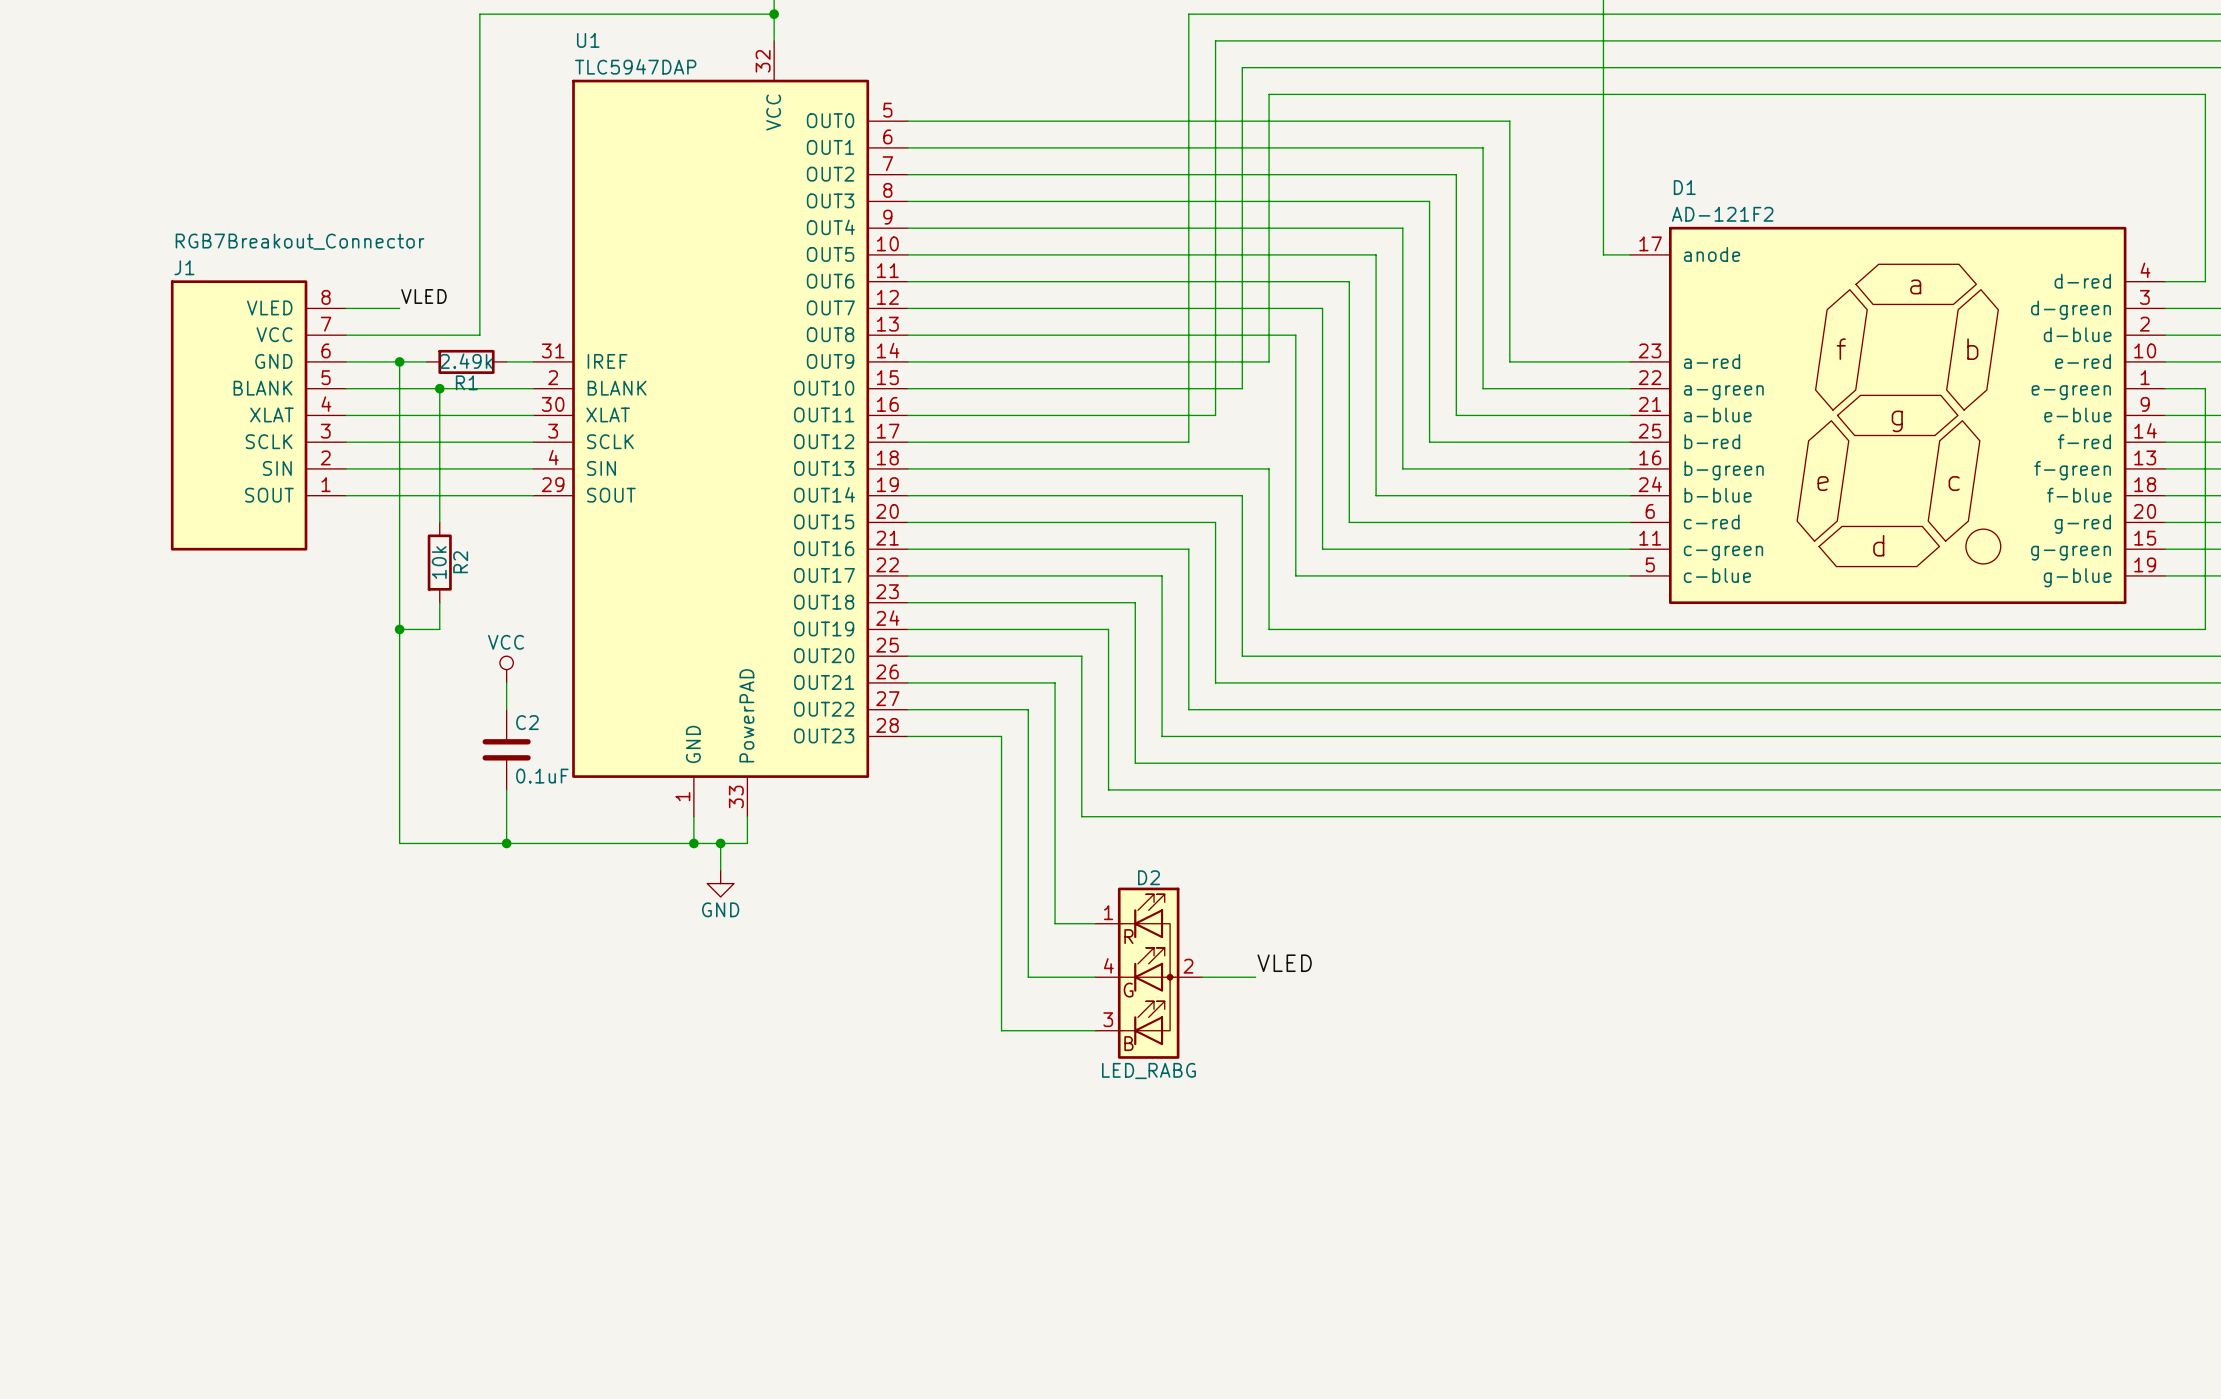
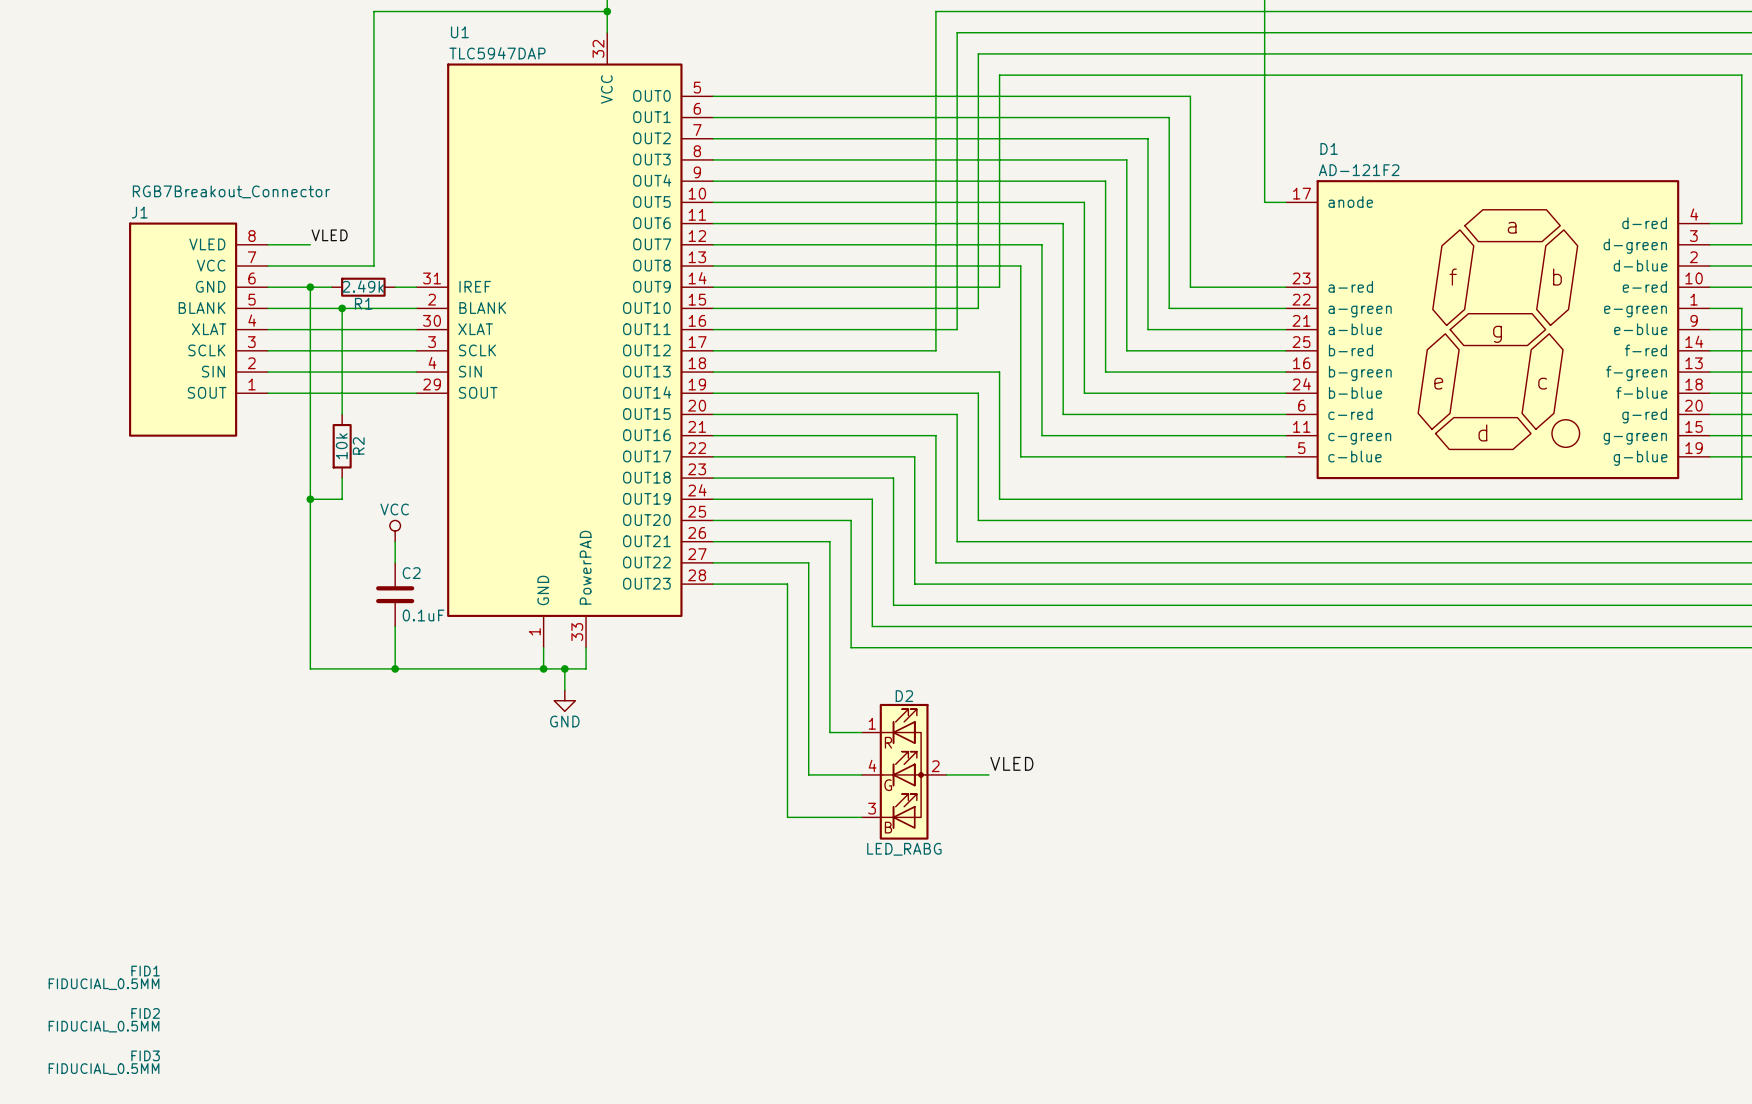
FID1: none -> FIDUCIAL_0.5MM (104, 977)
FID2: none -> FIDUCIAL_0.5MM (104, 1020)
FID3: none -> FIDUCIAL_0.5MM (104, 1062)

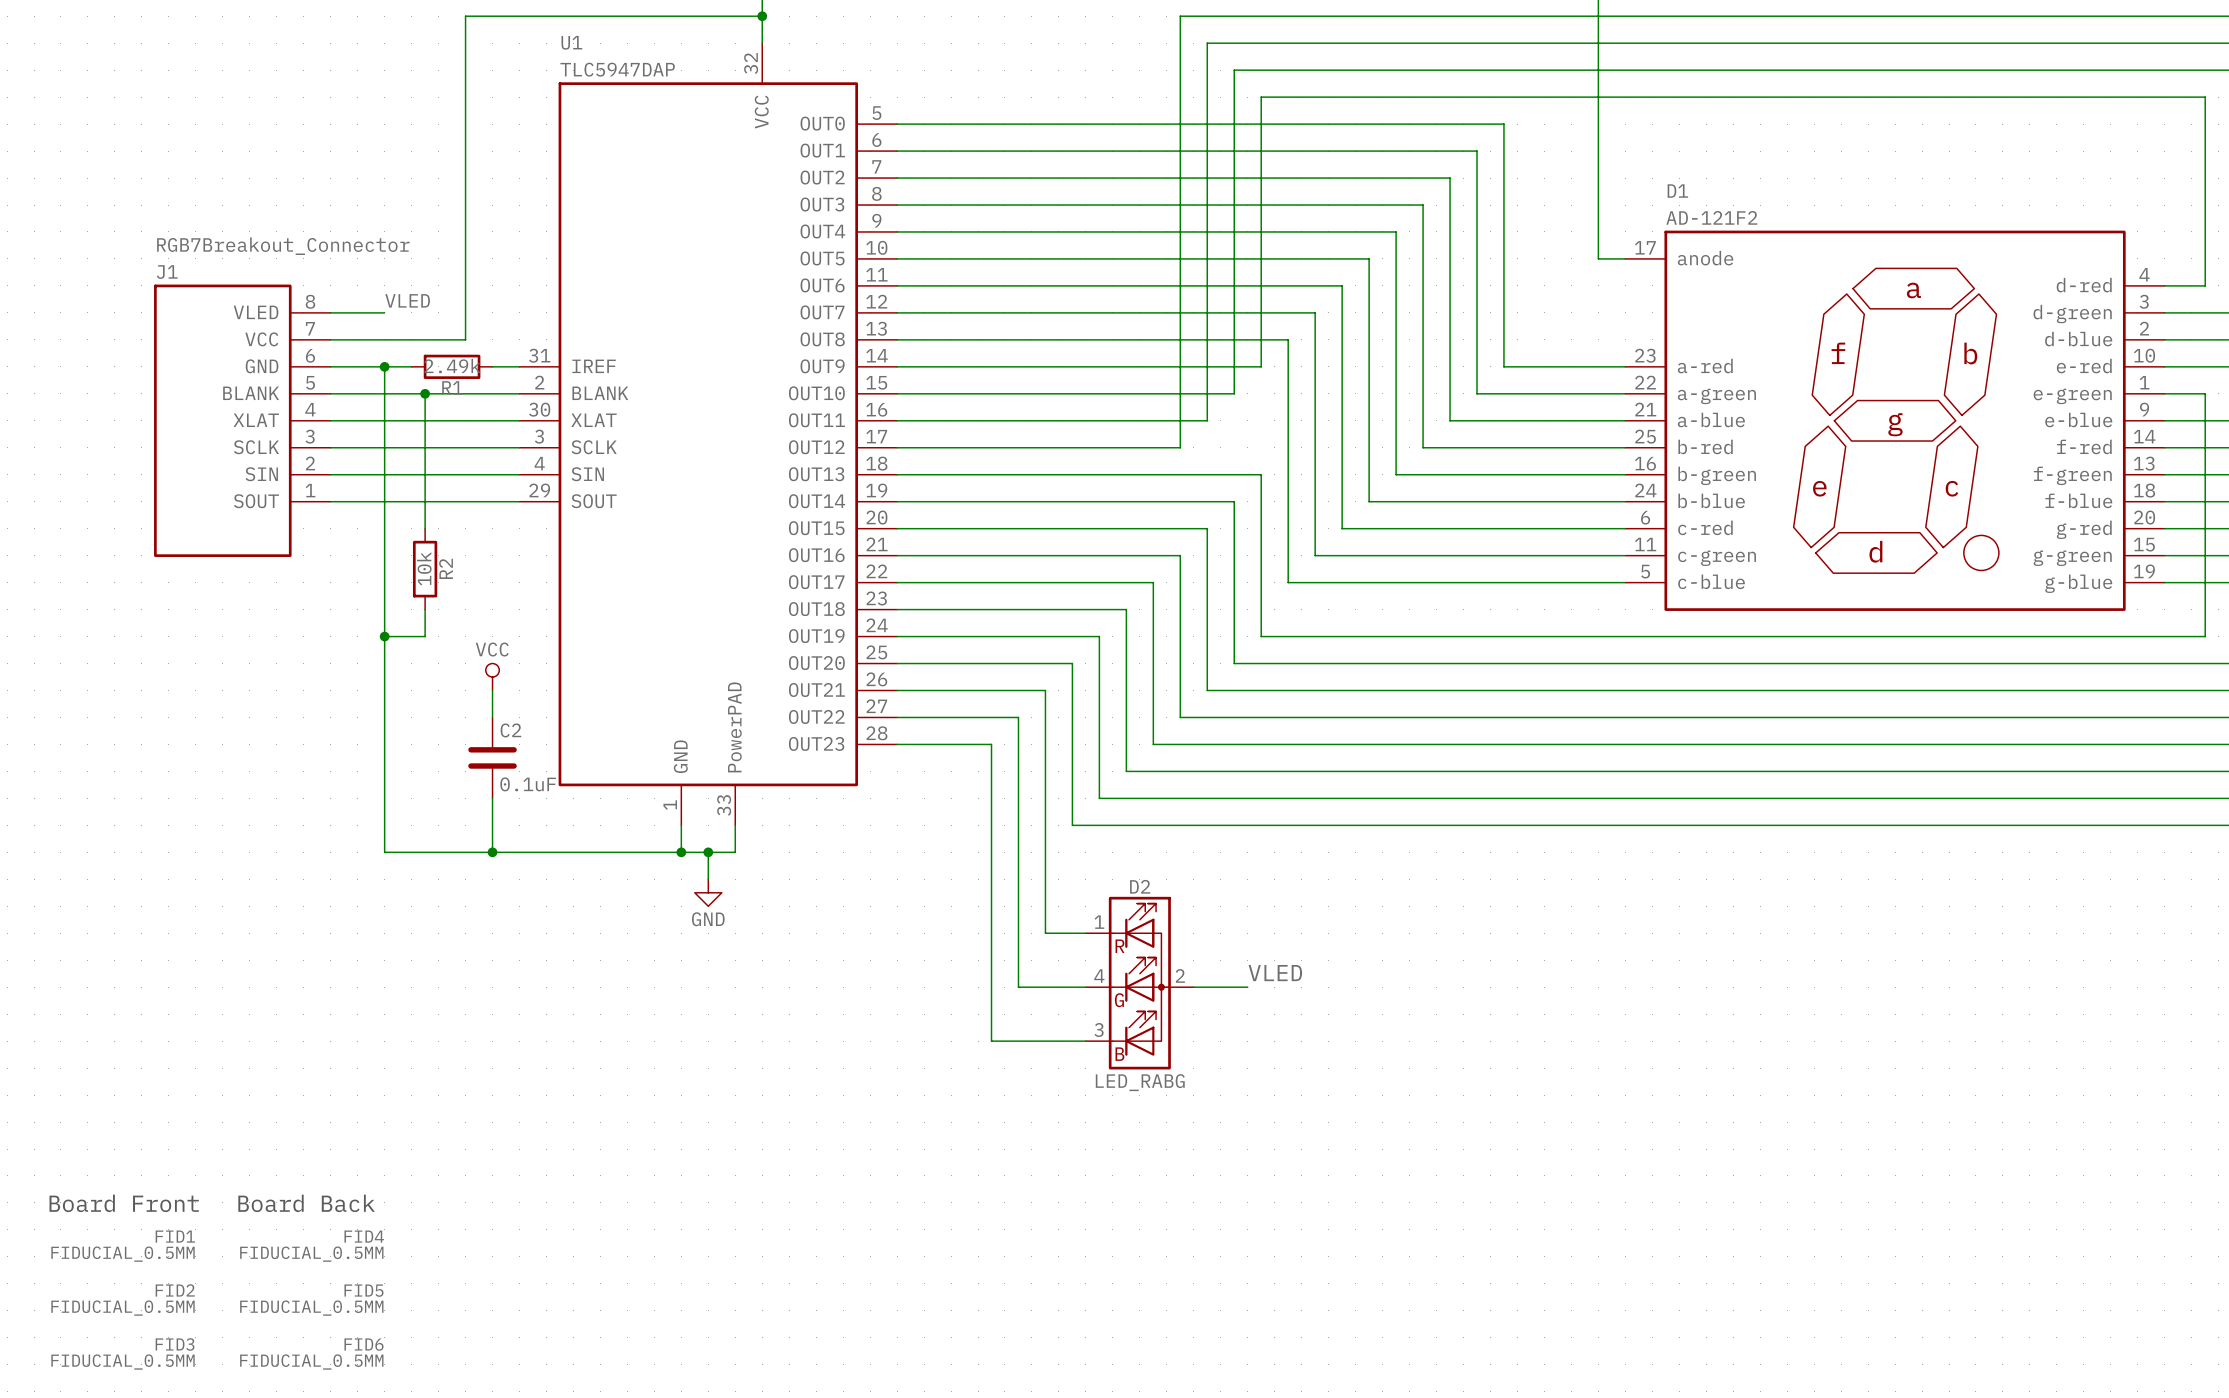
text: none -> Board Front (124, 1203)
text: none -> Board Back (306, 1203)
FID4: none -> FIDUCIAL_0.5MM (312, 1246)
FID5: none -> FIDUCIAL_0.5MM (311, 1300)
FID6: none -> FIDUCIAL_0.5MM (311, 1354)

